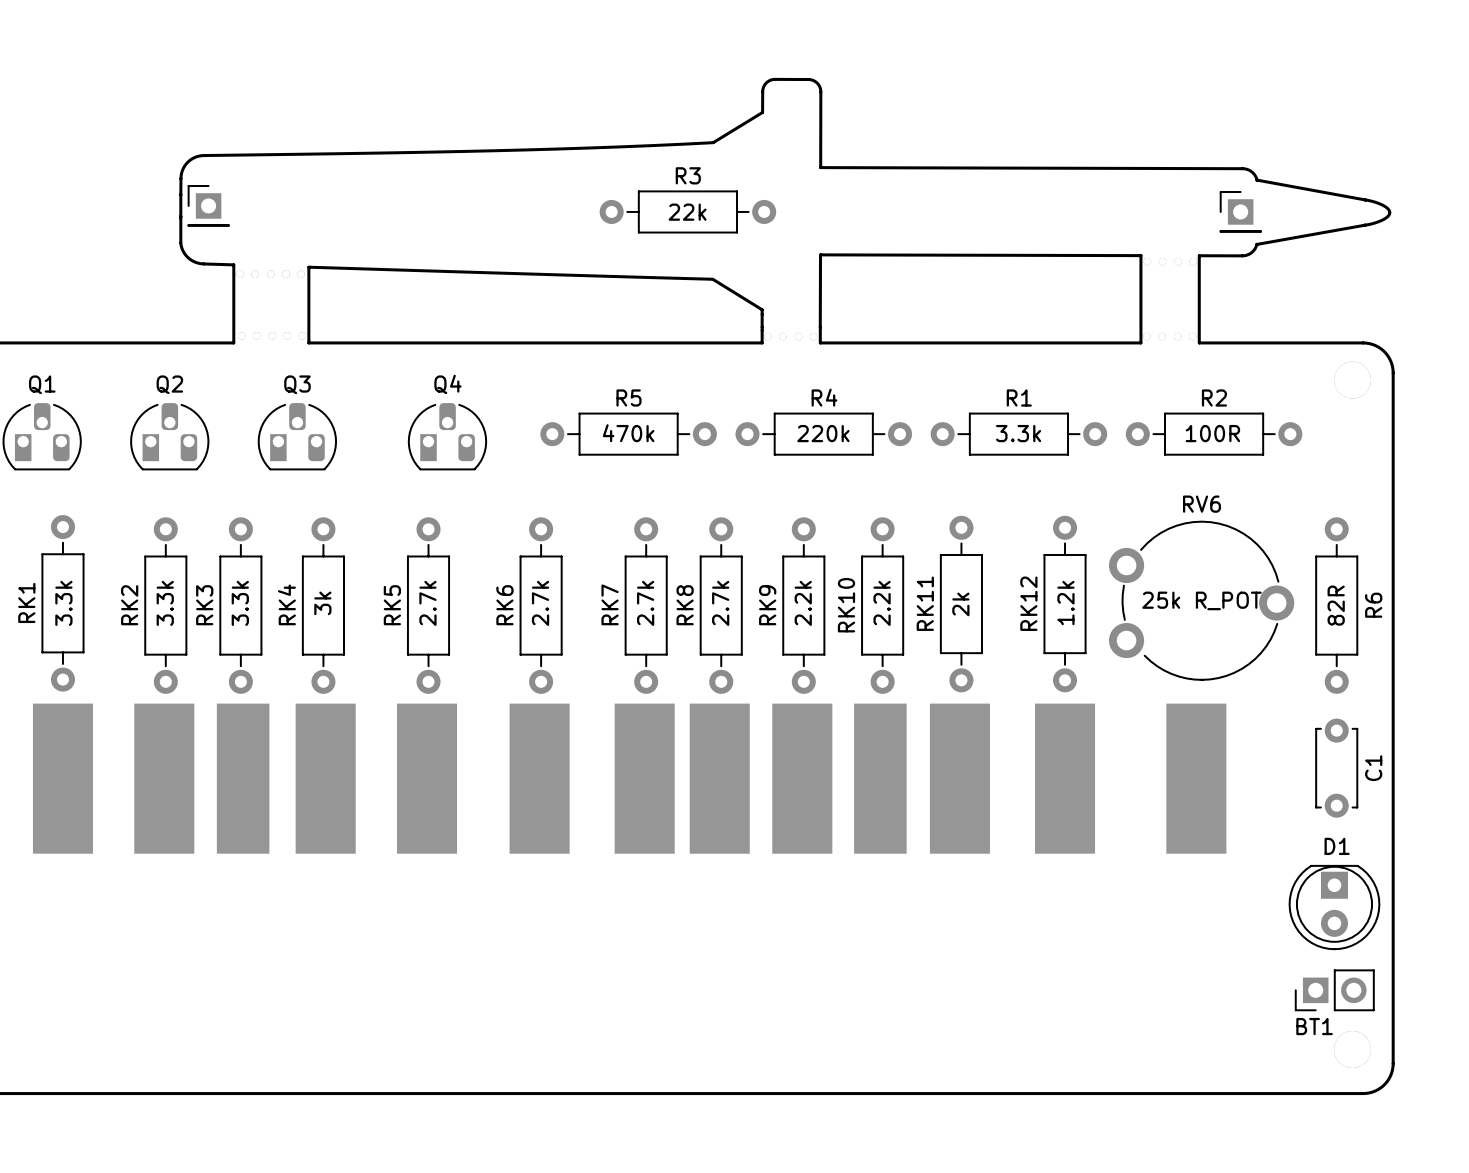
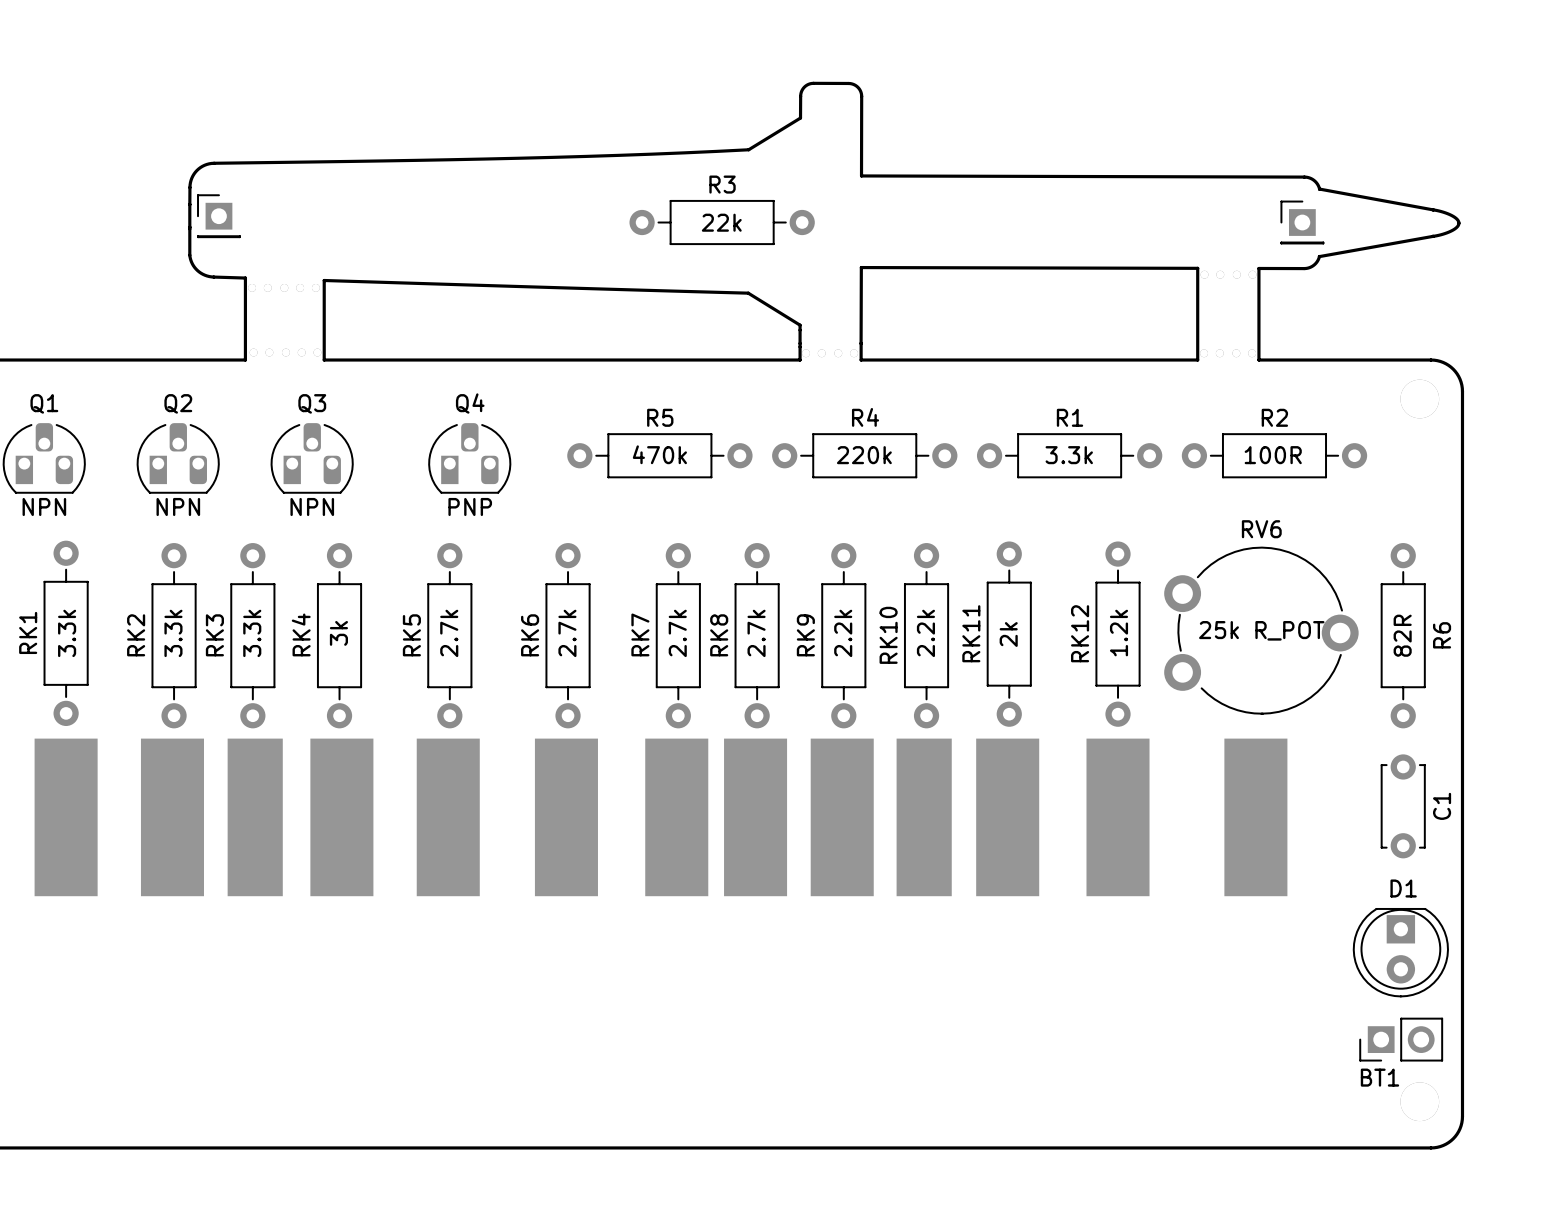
Q1 value: none -> NPN (44, 506)
Q2 value: none -> NPN (178, 506)
Q3 value: none -> NPN (312, 506)
Q4 value: none -> PNP (470, 506)

